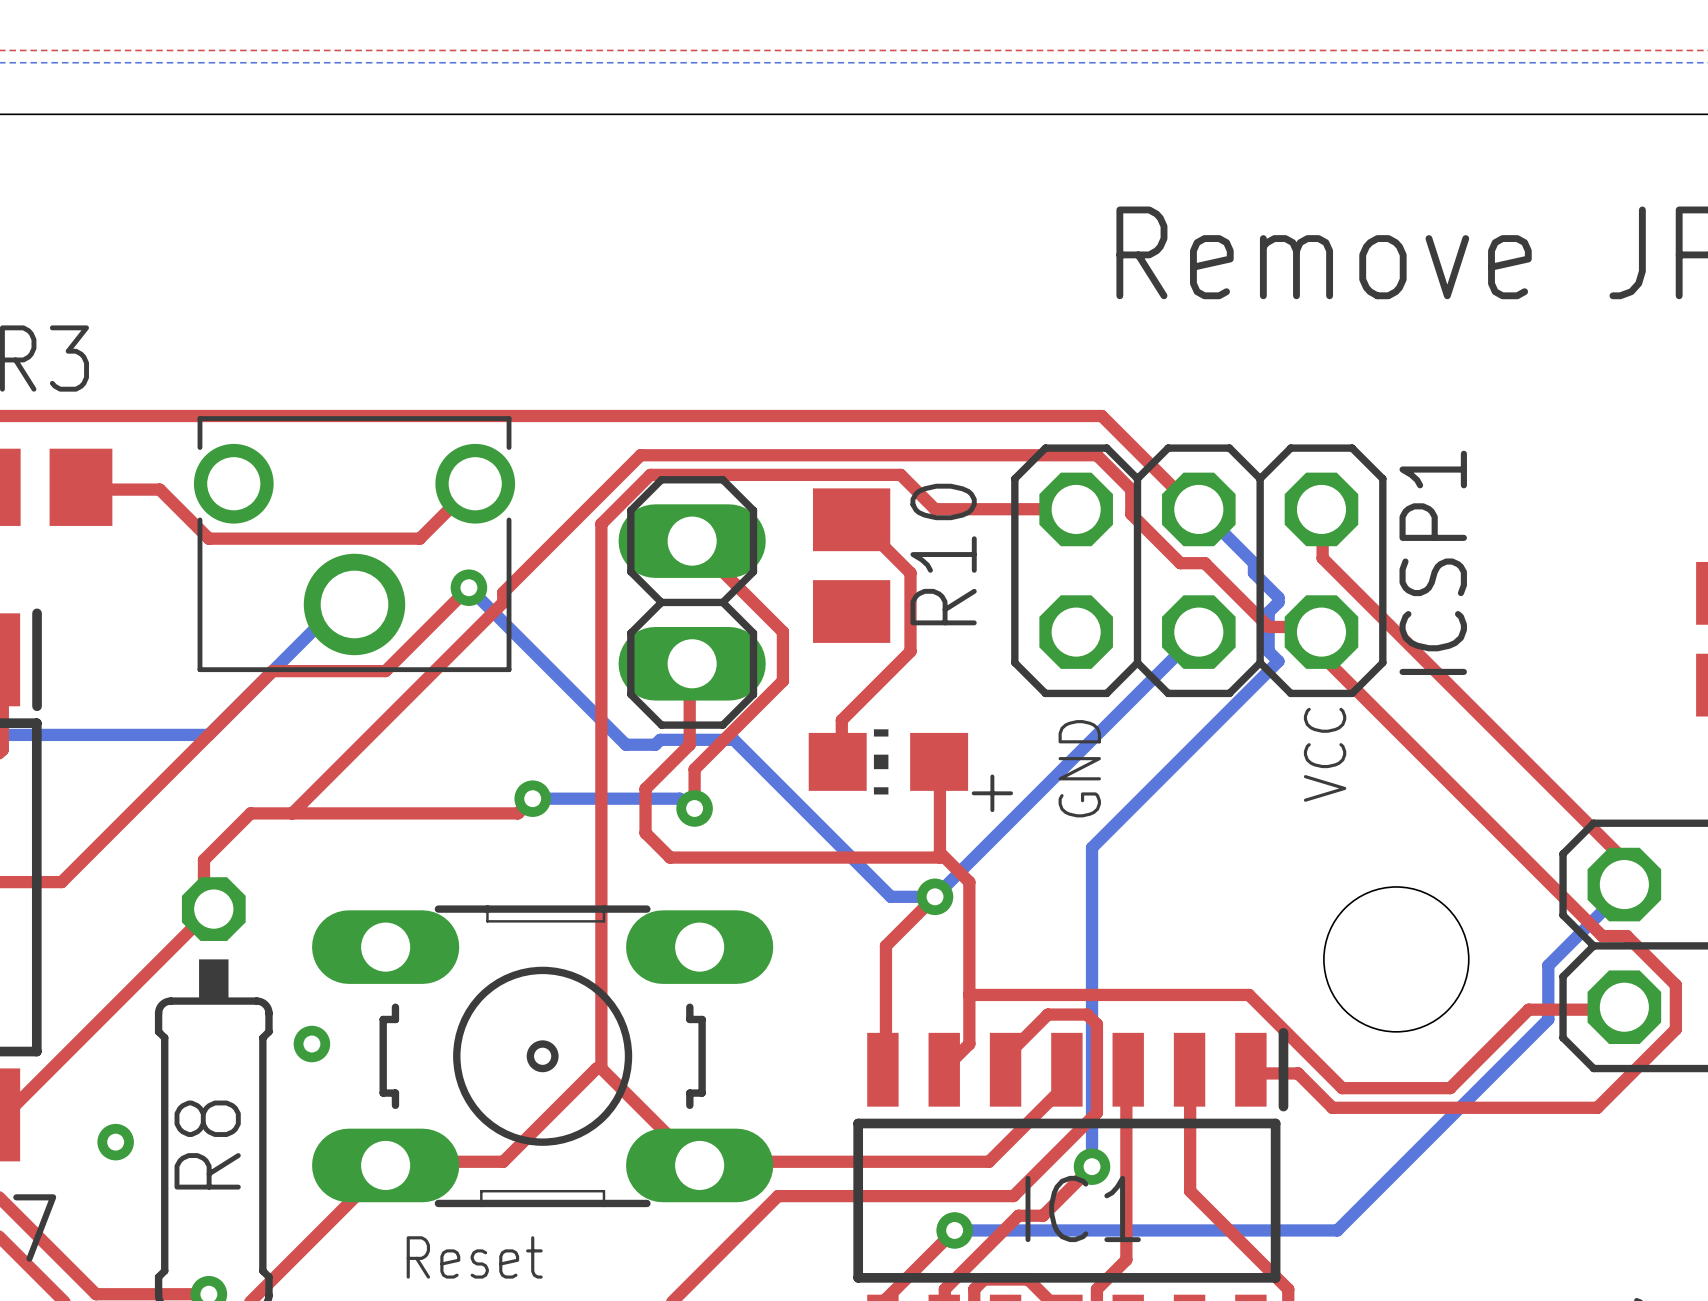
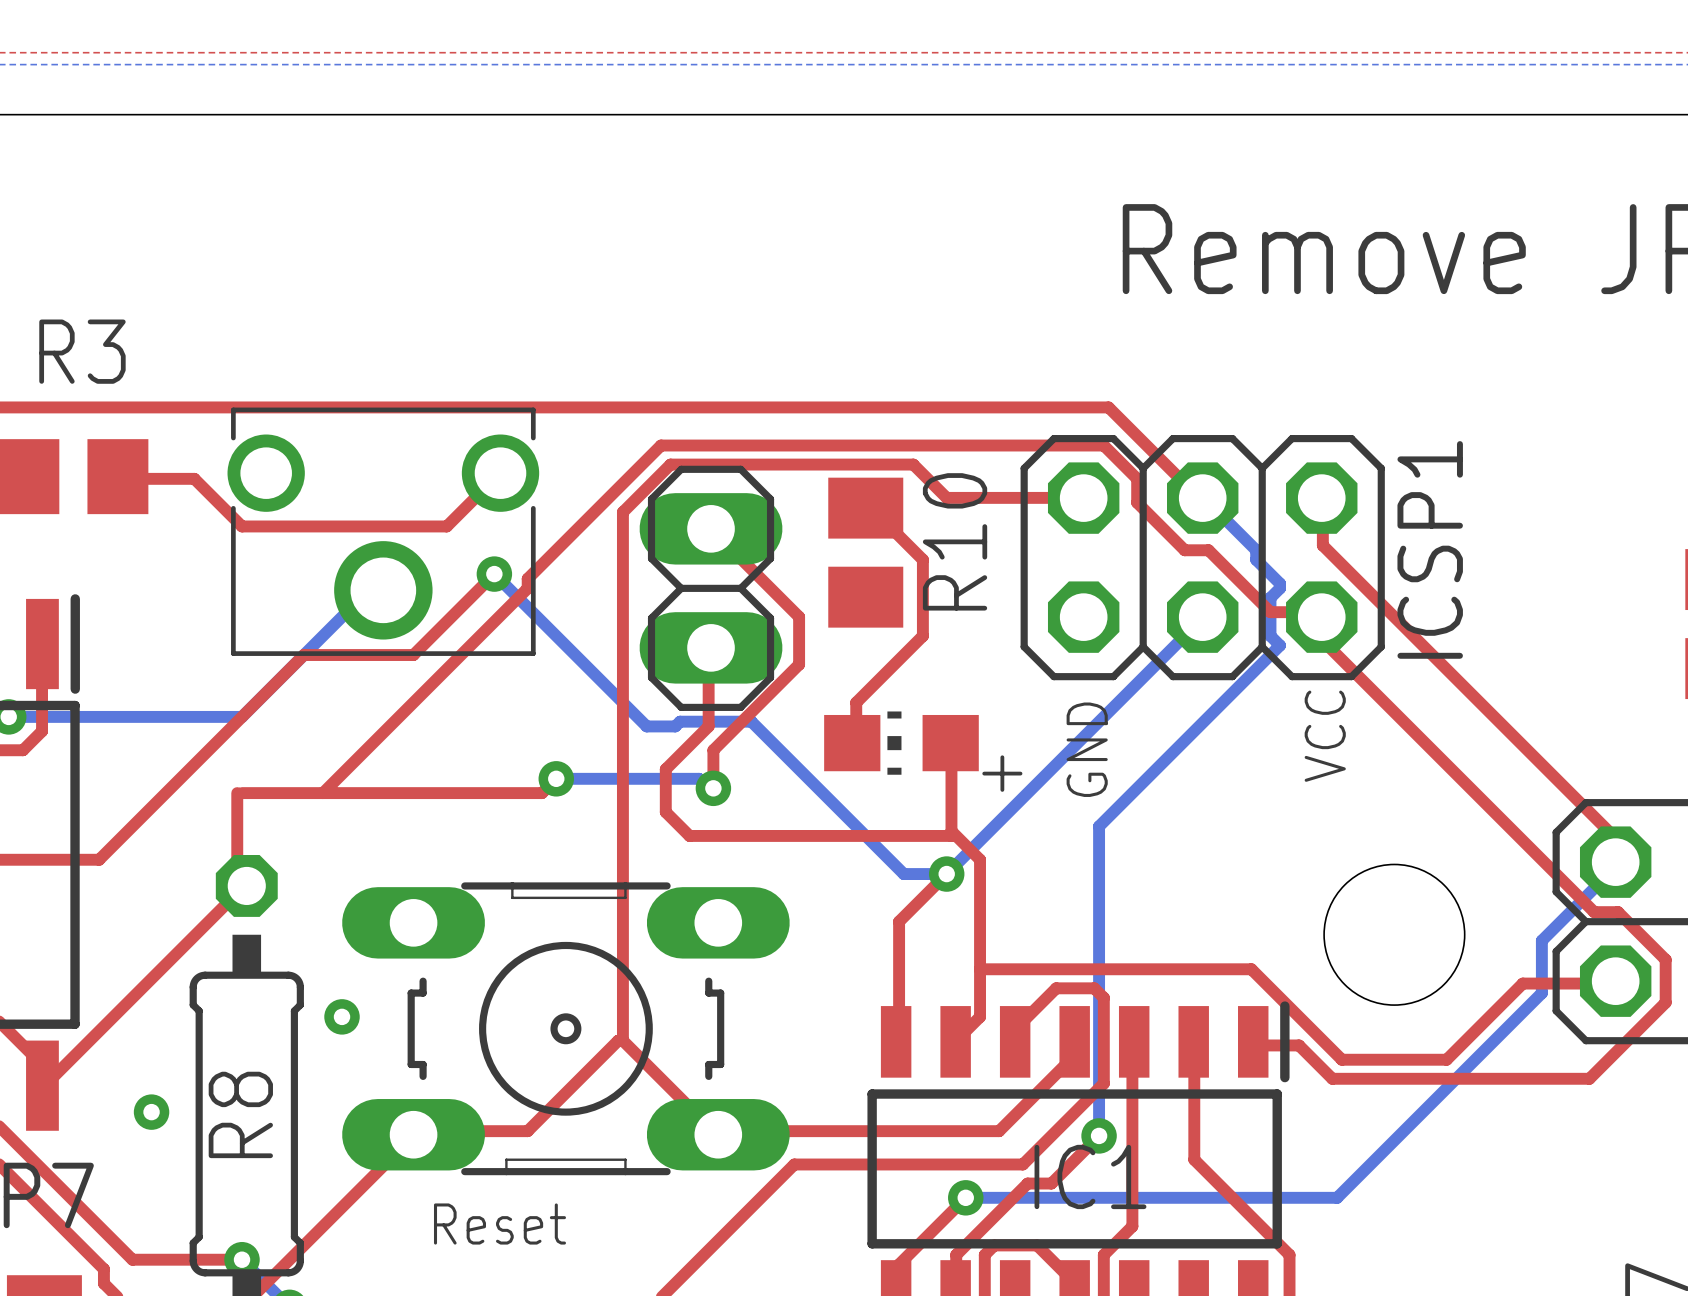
top track: none -> (242, 793) (282, 793)
top track: (250, 813) (203, 860) -> (237, 793) (237, 838)

